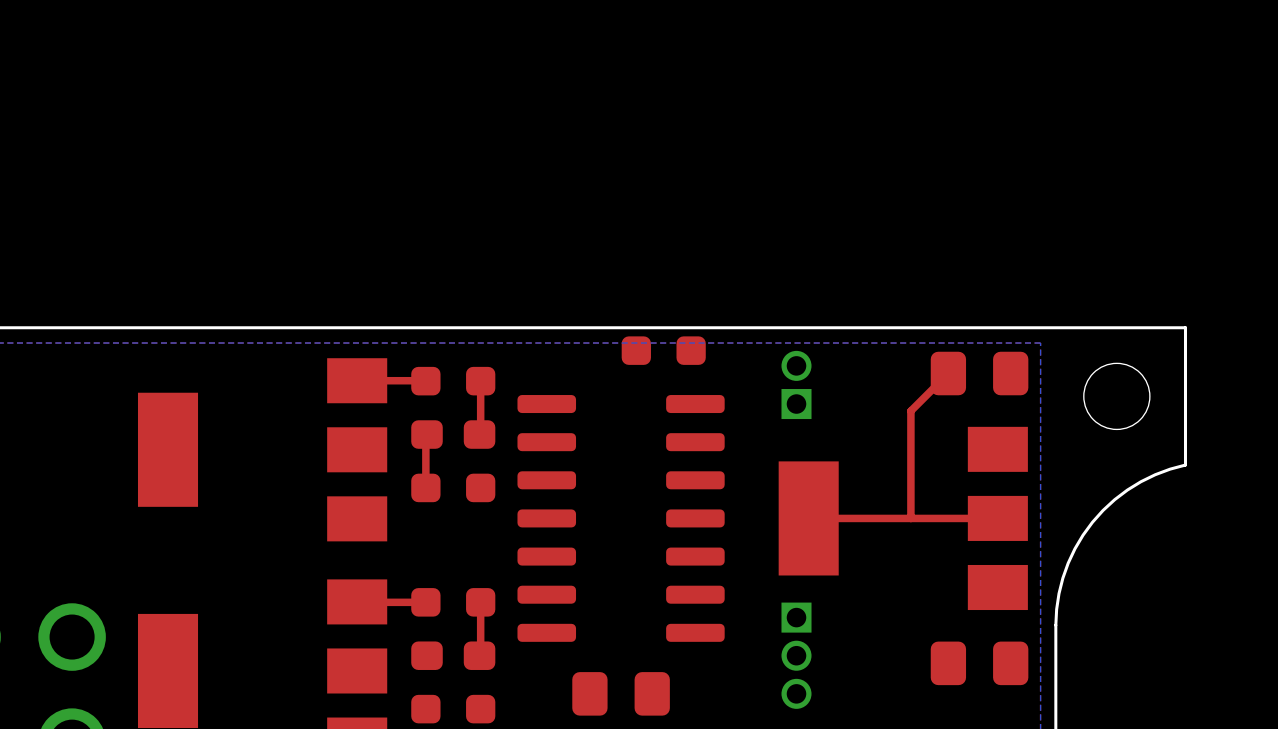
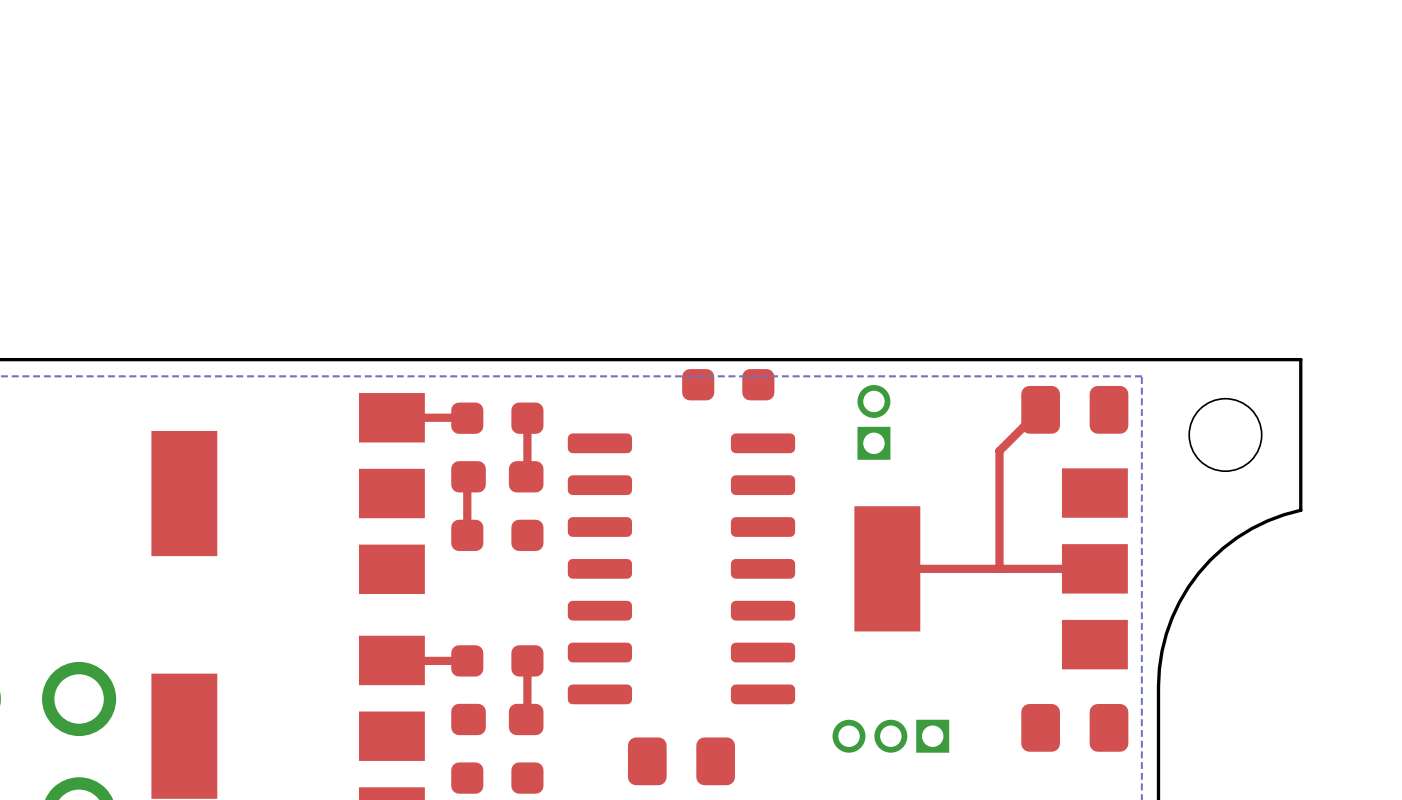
part rotation: 0° (796, 655) -> 90° clockwise (890, 736)

